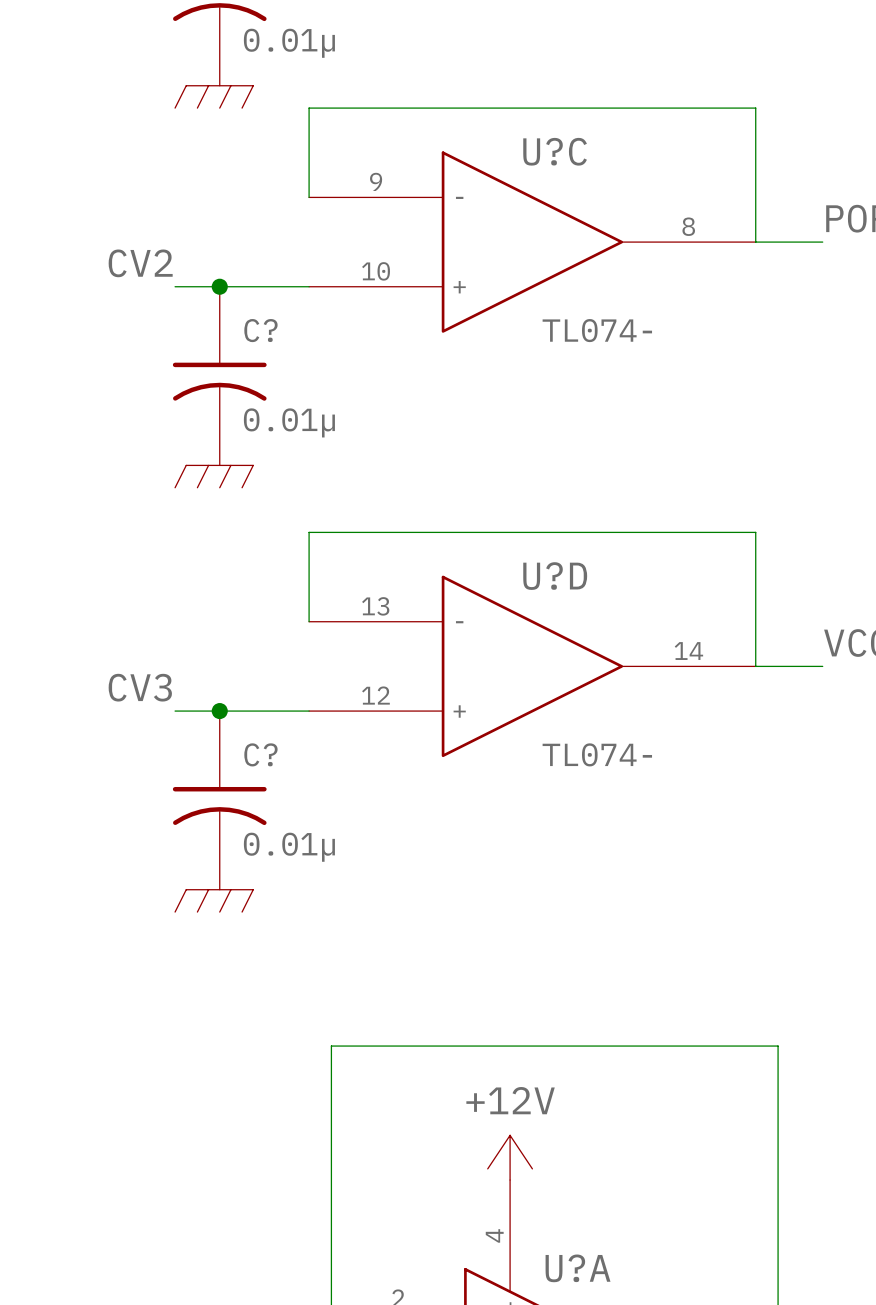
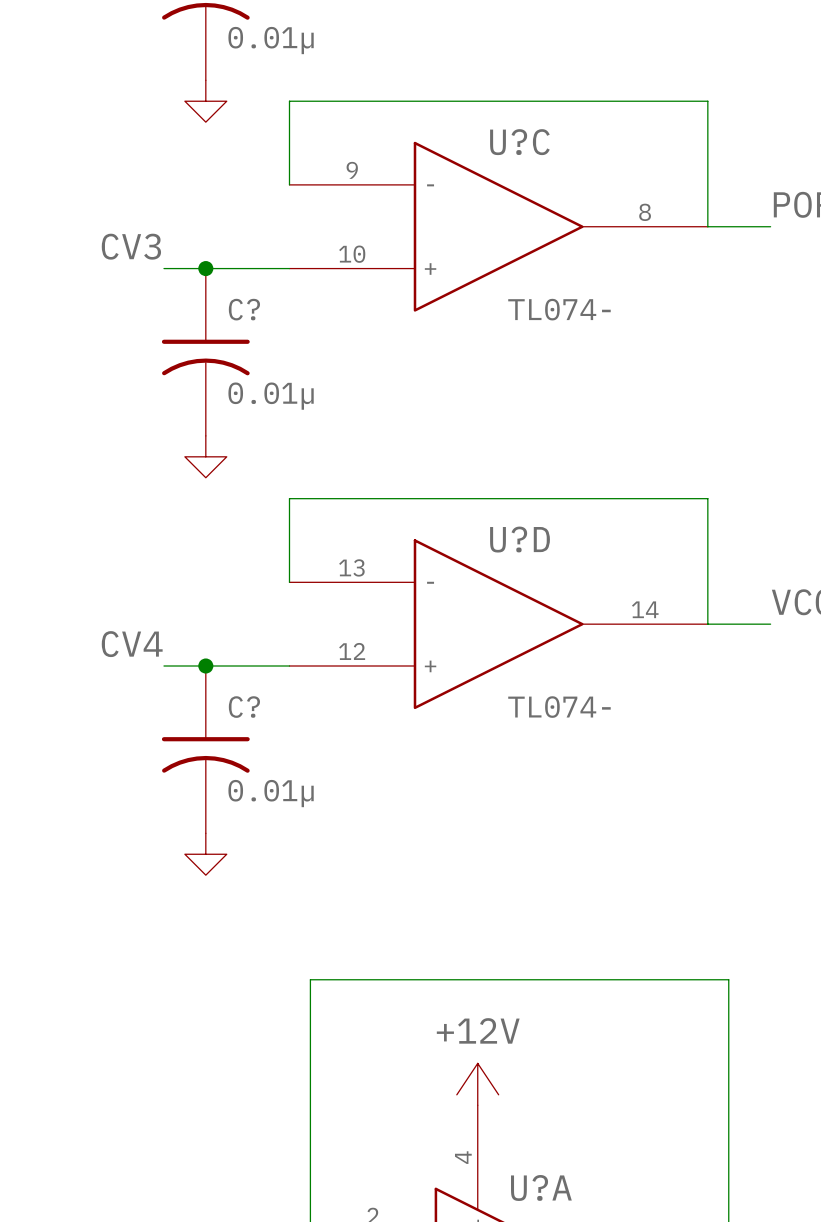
power symbol shape: [175, 85, 254, 109] -> [184, 80, 227, 123]
label: CV2 (140, 263) -> CV3 (131, 246)
power symbol shape: [175, 465, 254, 488] -> [184, 435, 227, 478]
label: CV3 (140, 687) -> CV4 (132, 644)
power symbol shape: [175, 889, 254, 913] -> [184, 833, 227, 876]

